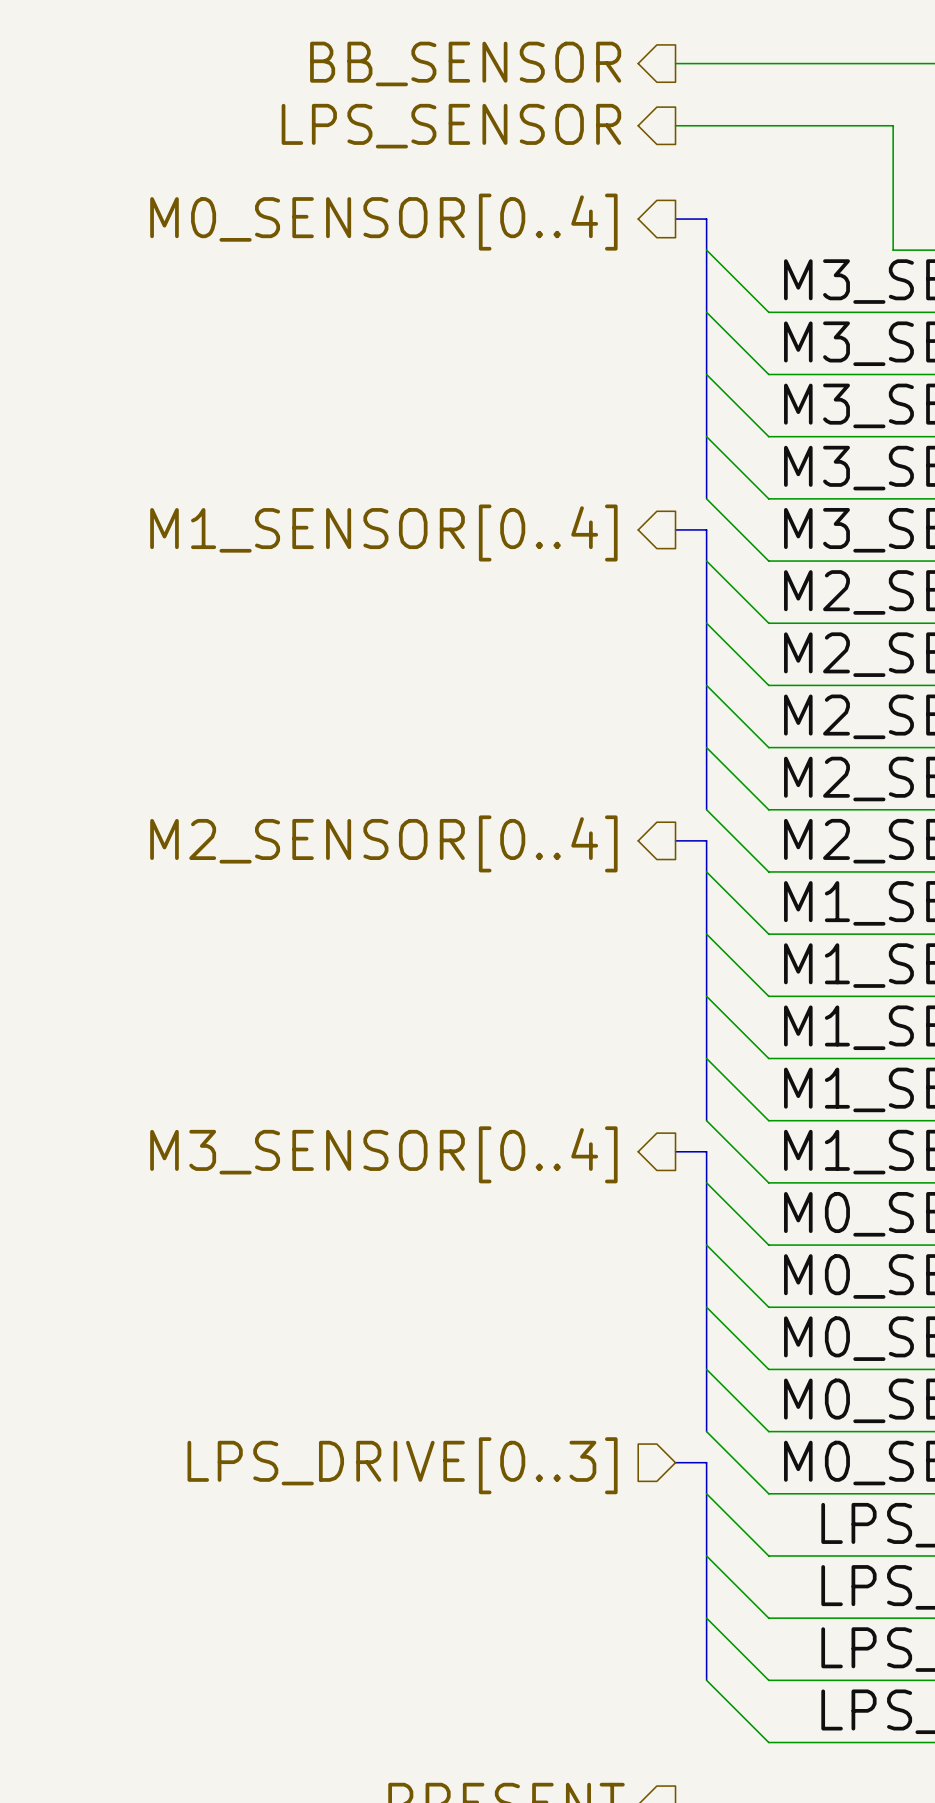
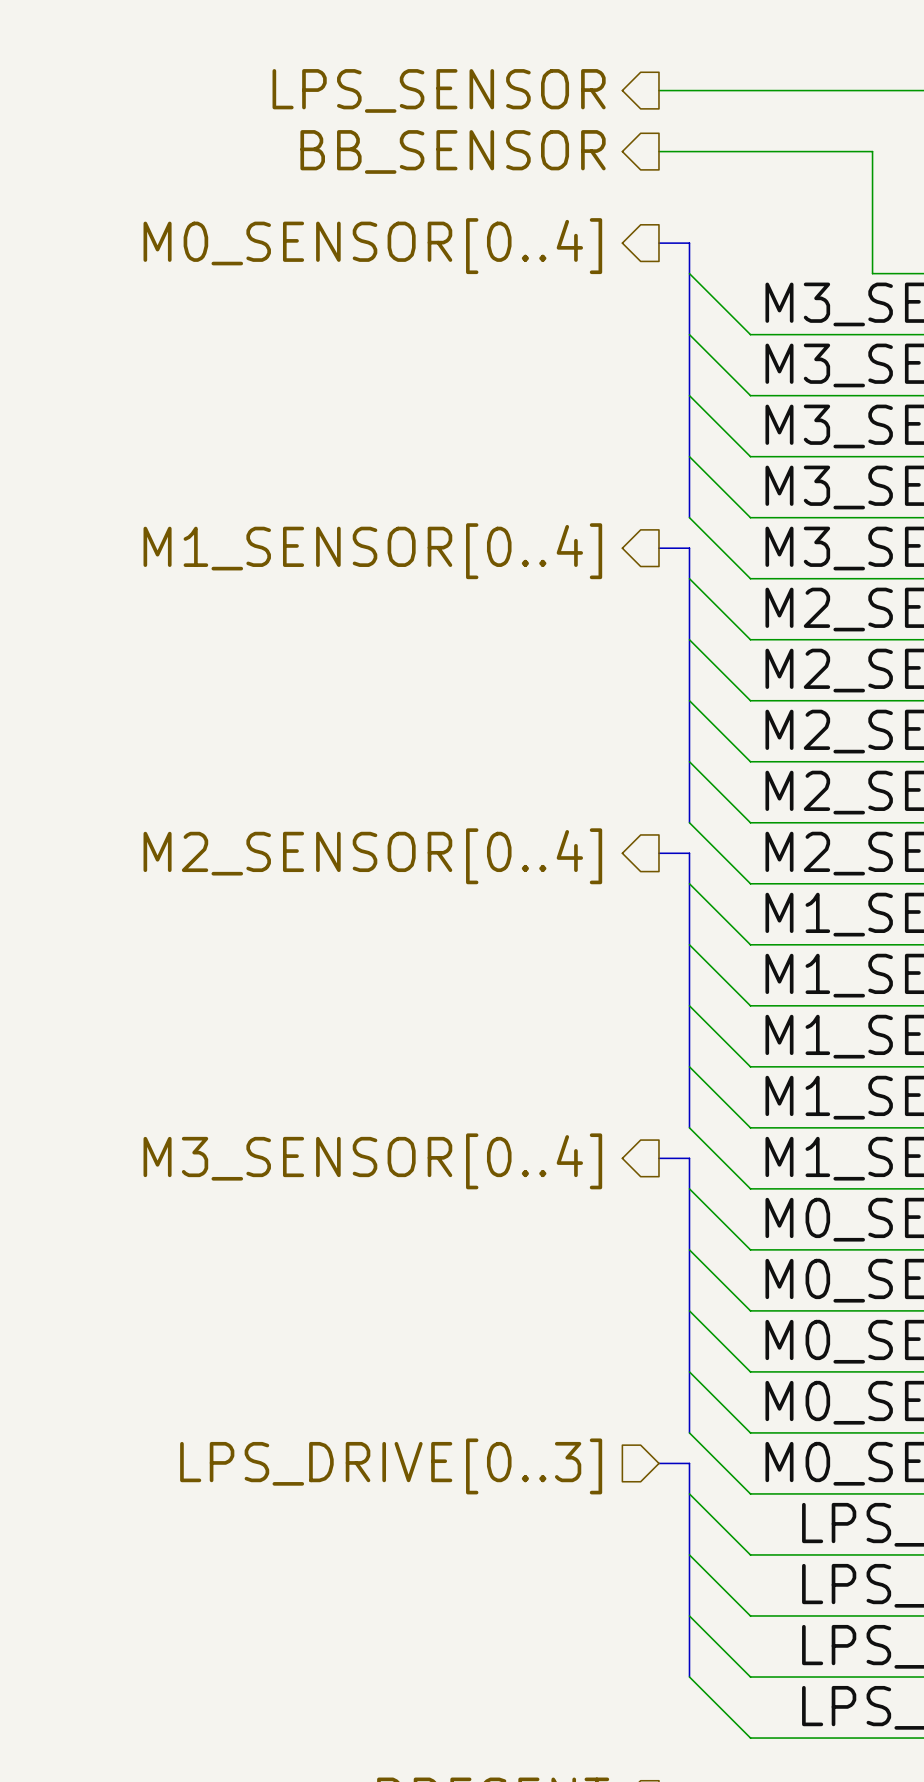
hierarchical label: BB_SENSOR (465, 63) -> LPS_SENSOR (439, 90)
hierarchical label: LPS_SENSOR (451, 126) -> BB_SENSOR (453, 151)

